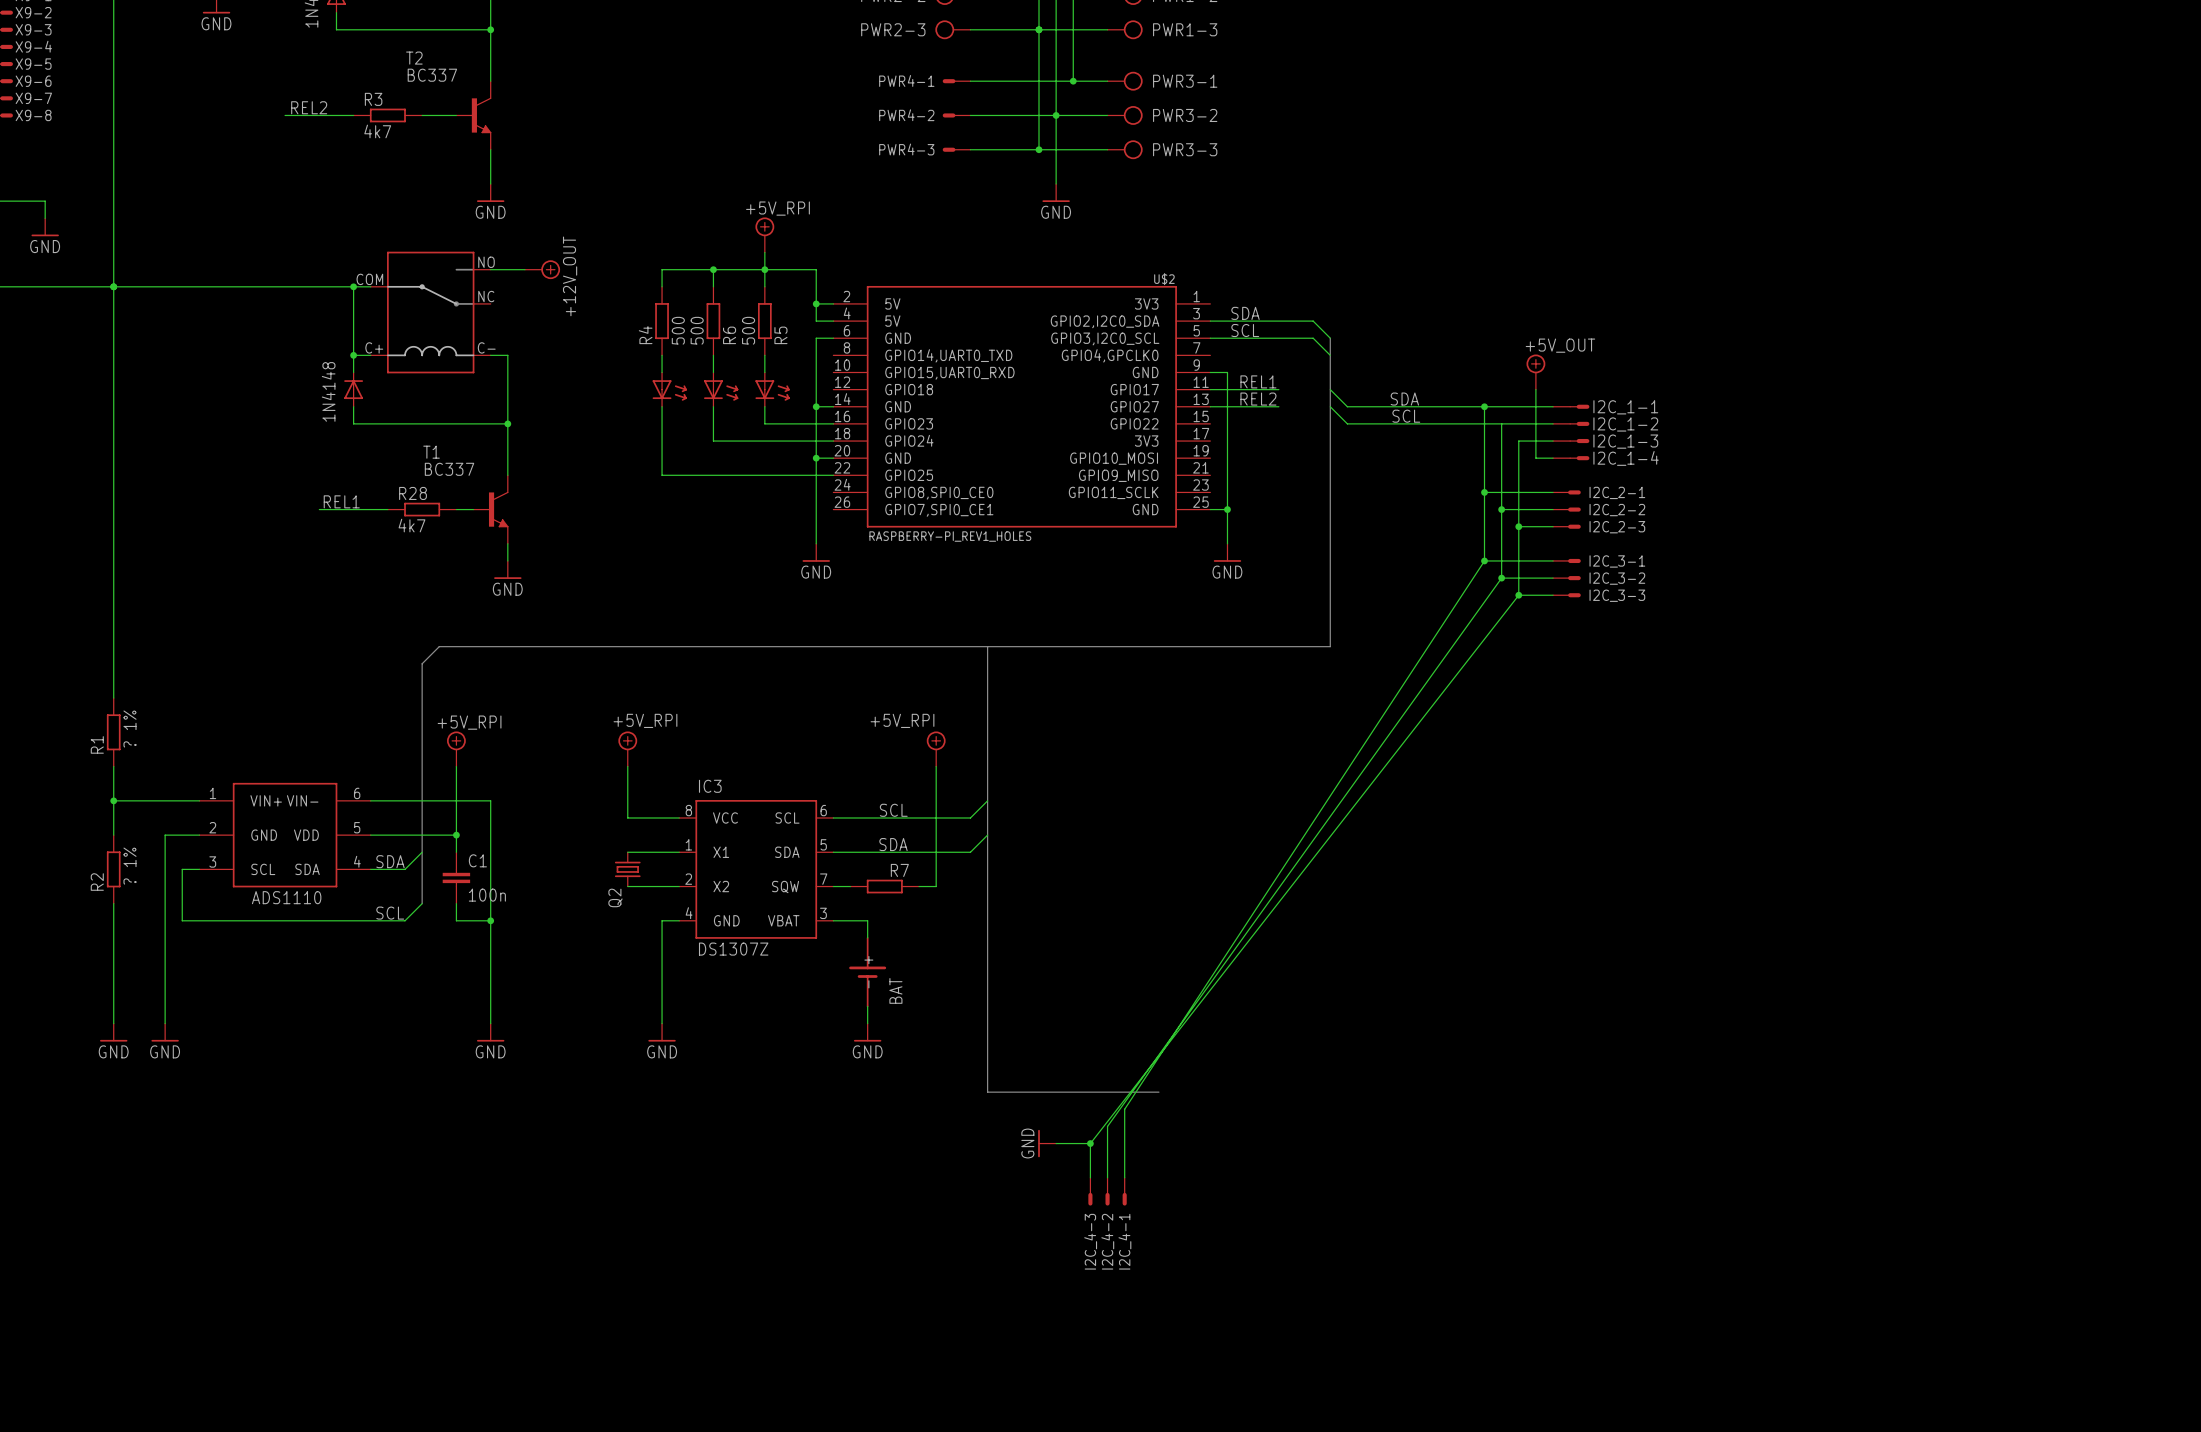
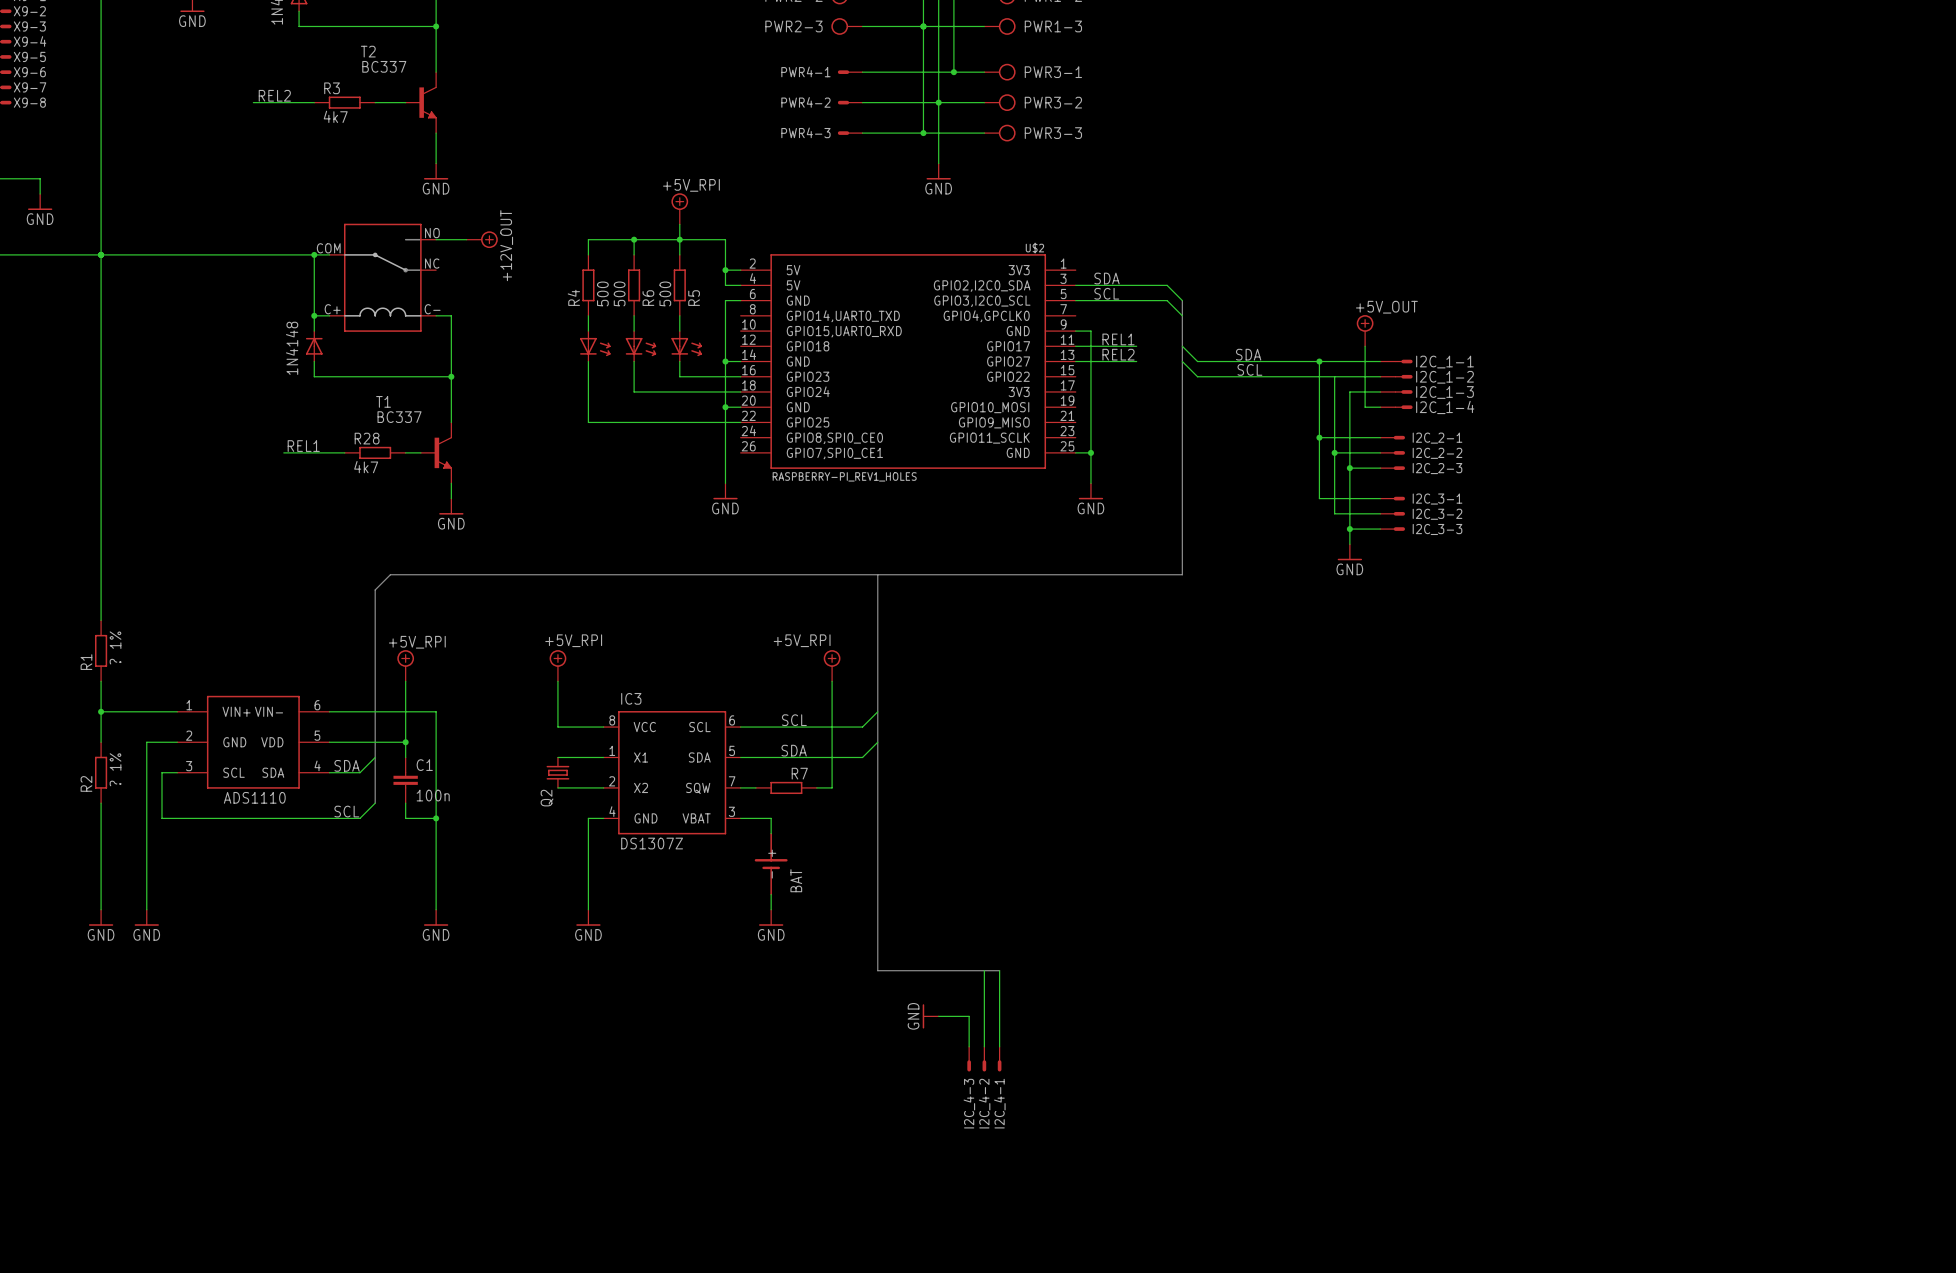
wire: (1484, 560) (1124, 1109) -> (999, 970) (999, 985)
junction: (1484, 560) -> none
wire: (1501, 578) (1107, 1126) -> (984, 970) (984, 1001)
junction: (1501, 578) -> none
wire: (1518, 595) (1090, 1143) -> (1349, 529) (1349, 544)
power symbol: none -> GND (1349, 552)
bus: (1124, 1092) (1158, 1092) -> none
junction: (1090, 1143) -> none

